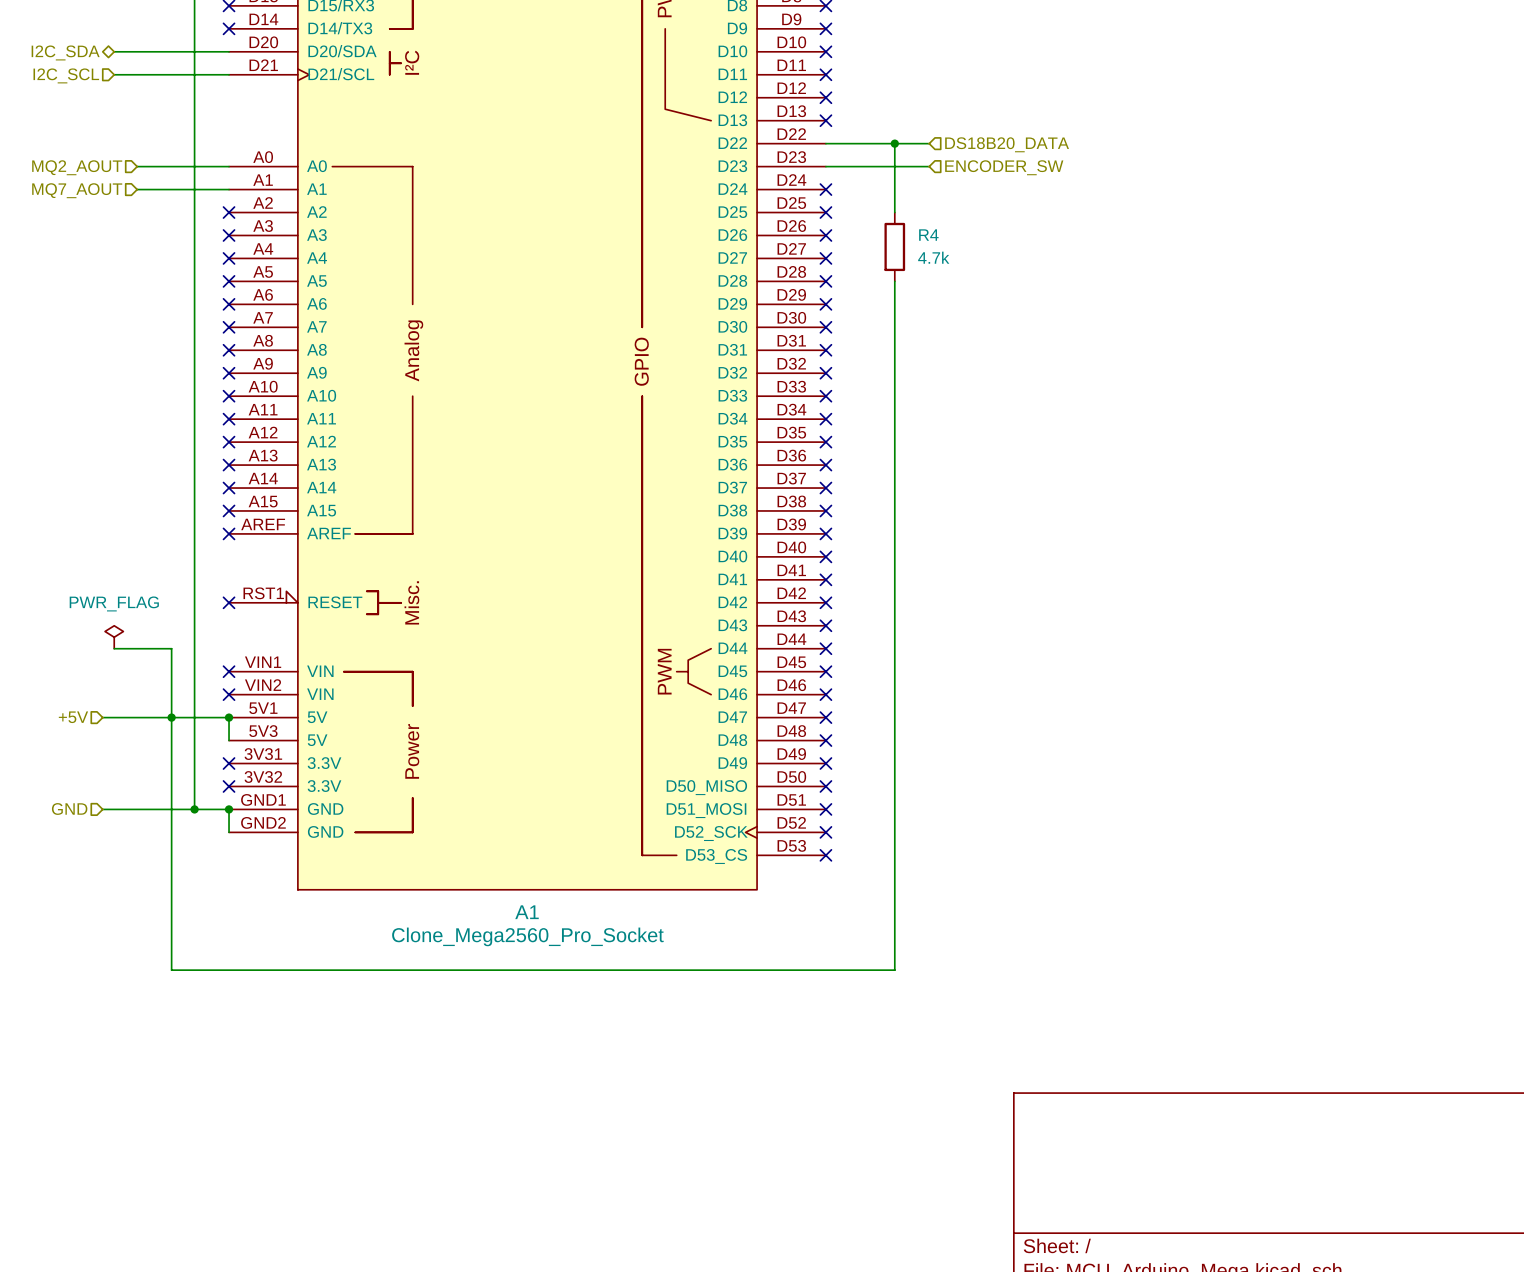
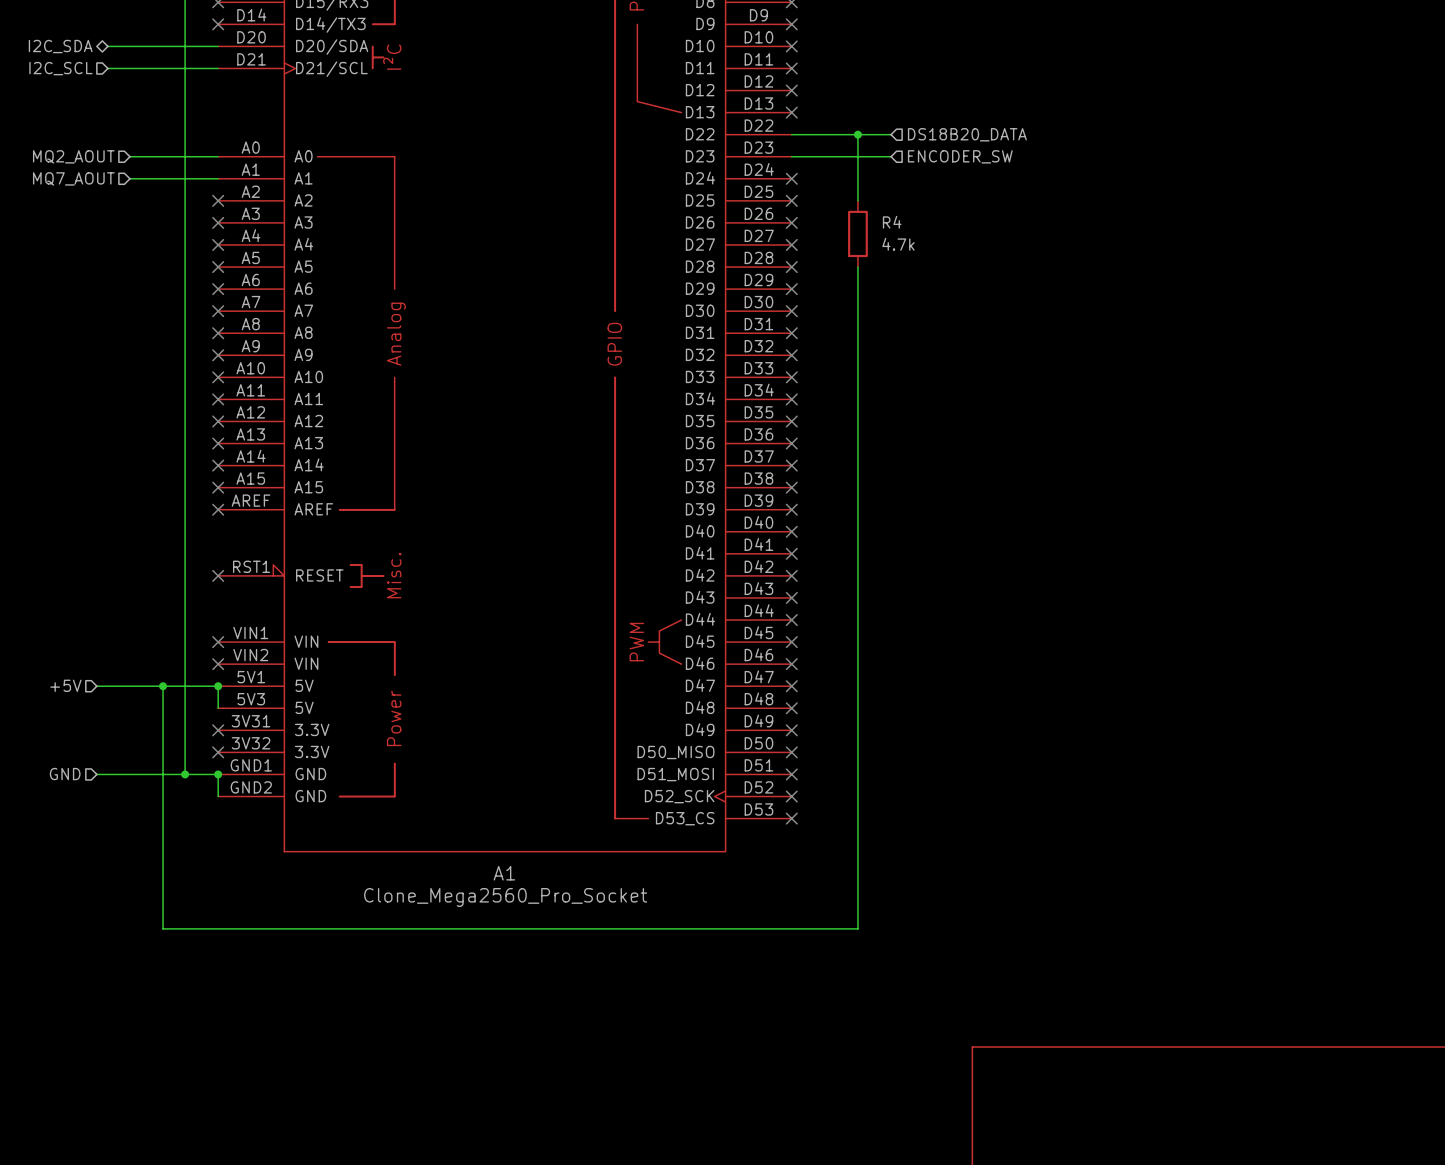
power symbol: PWR_FLAG (114, 637) -> none
wire: (114, 648) (171, 648) (171, 717) -> none

